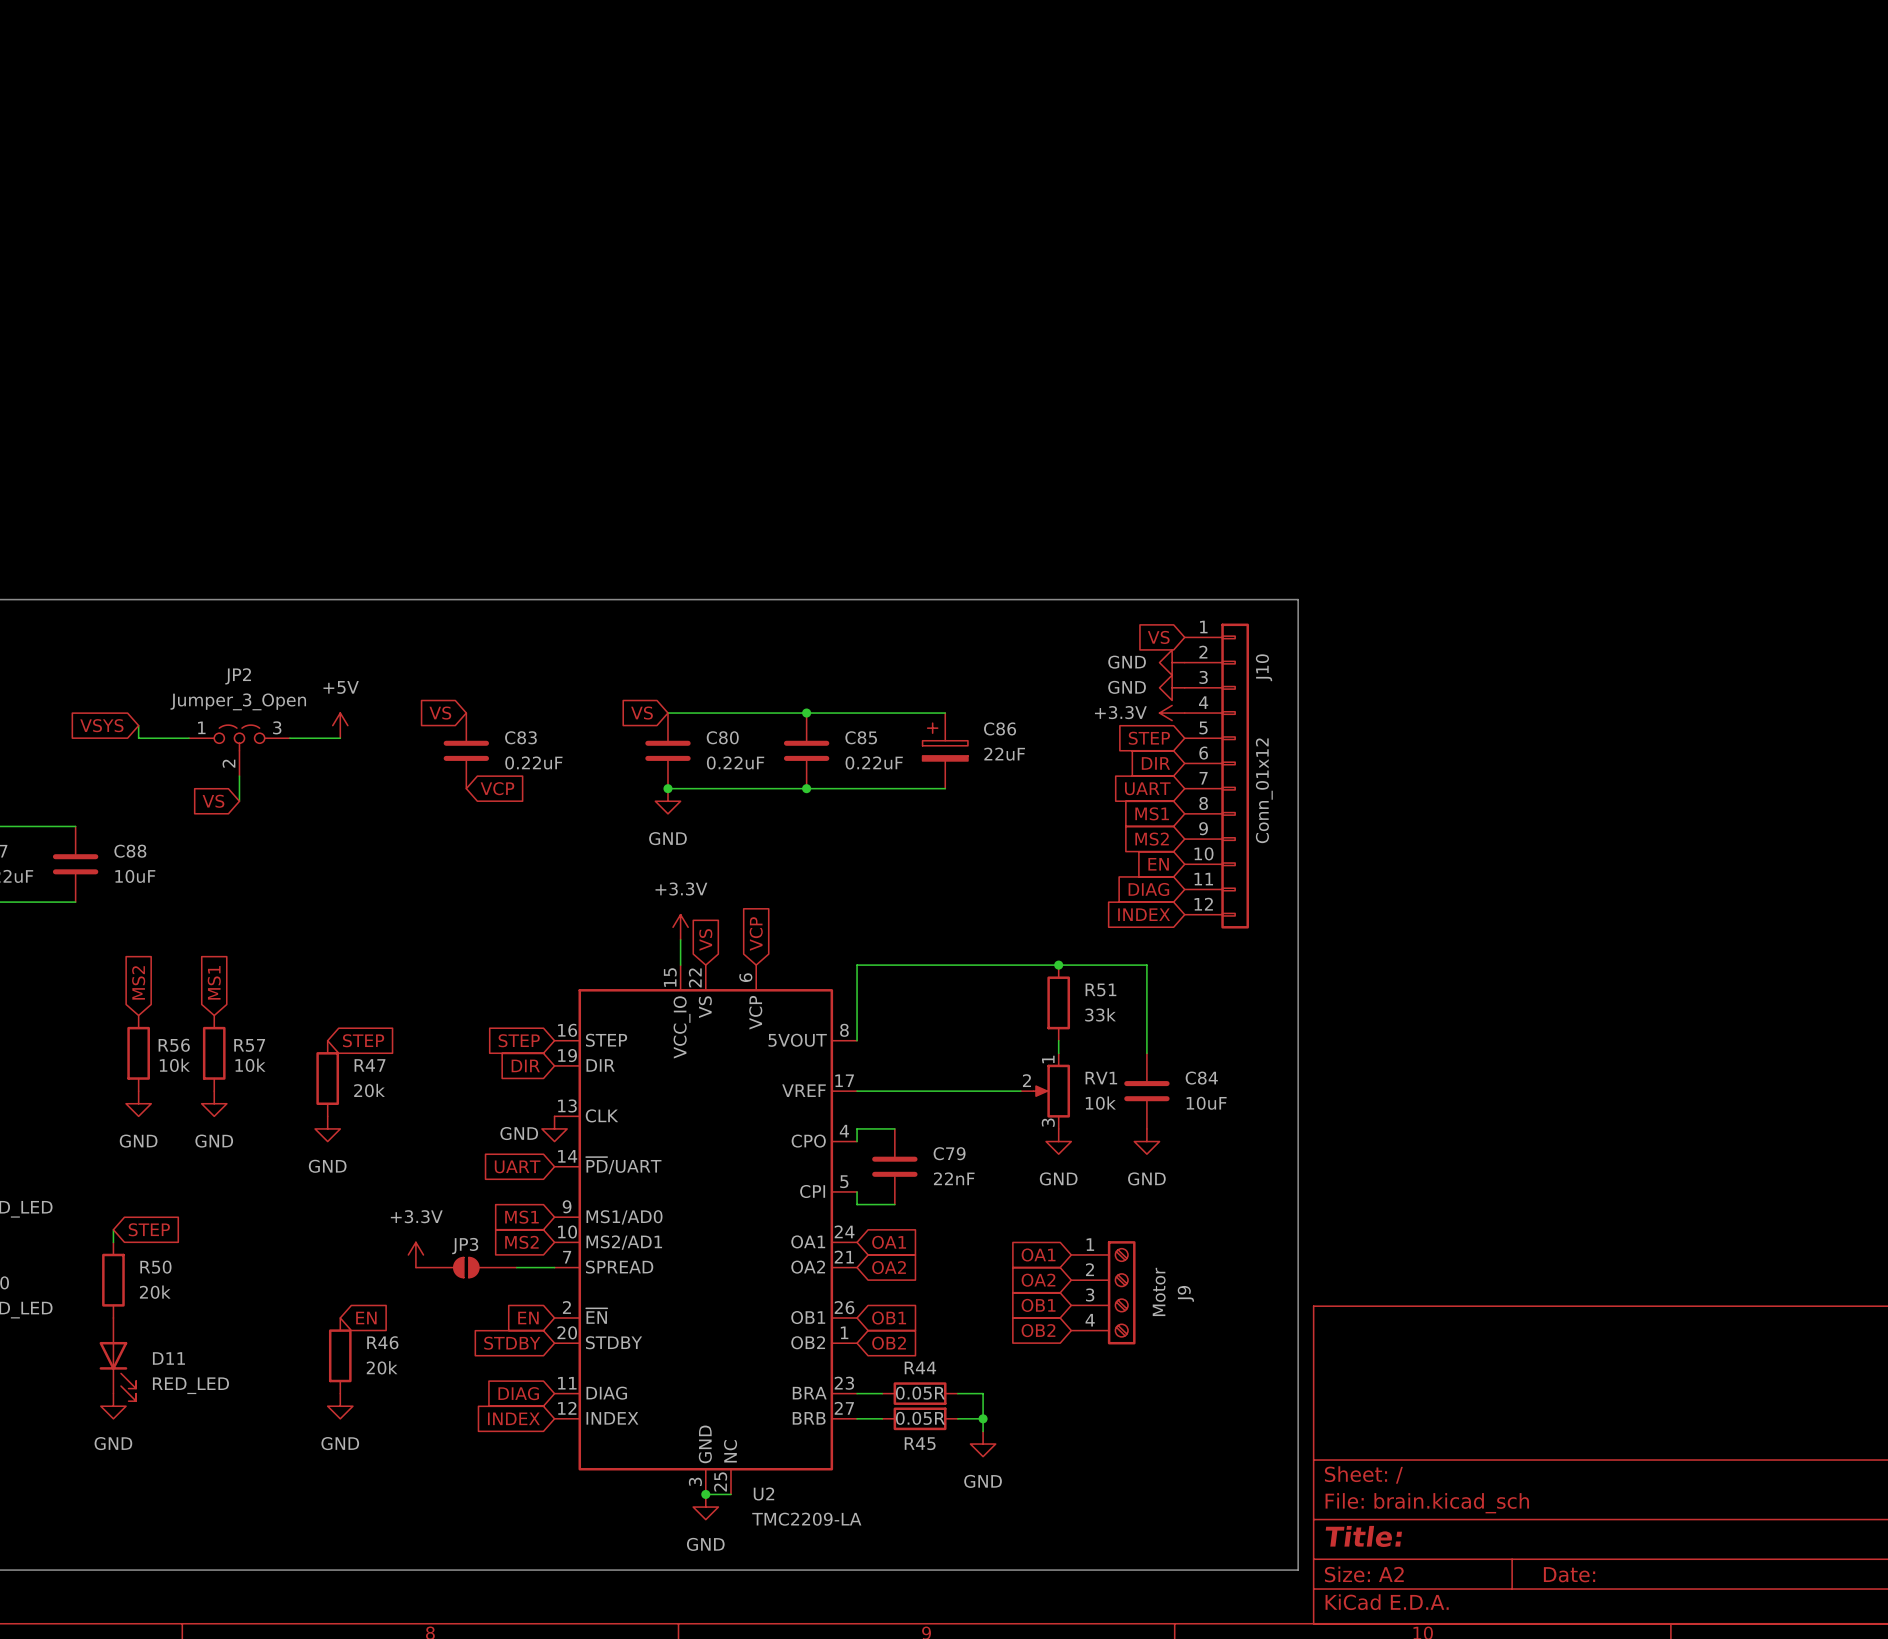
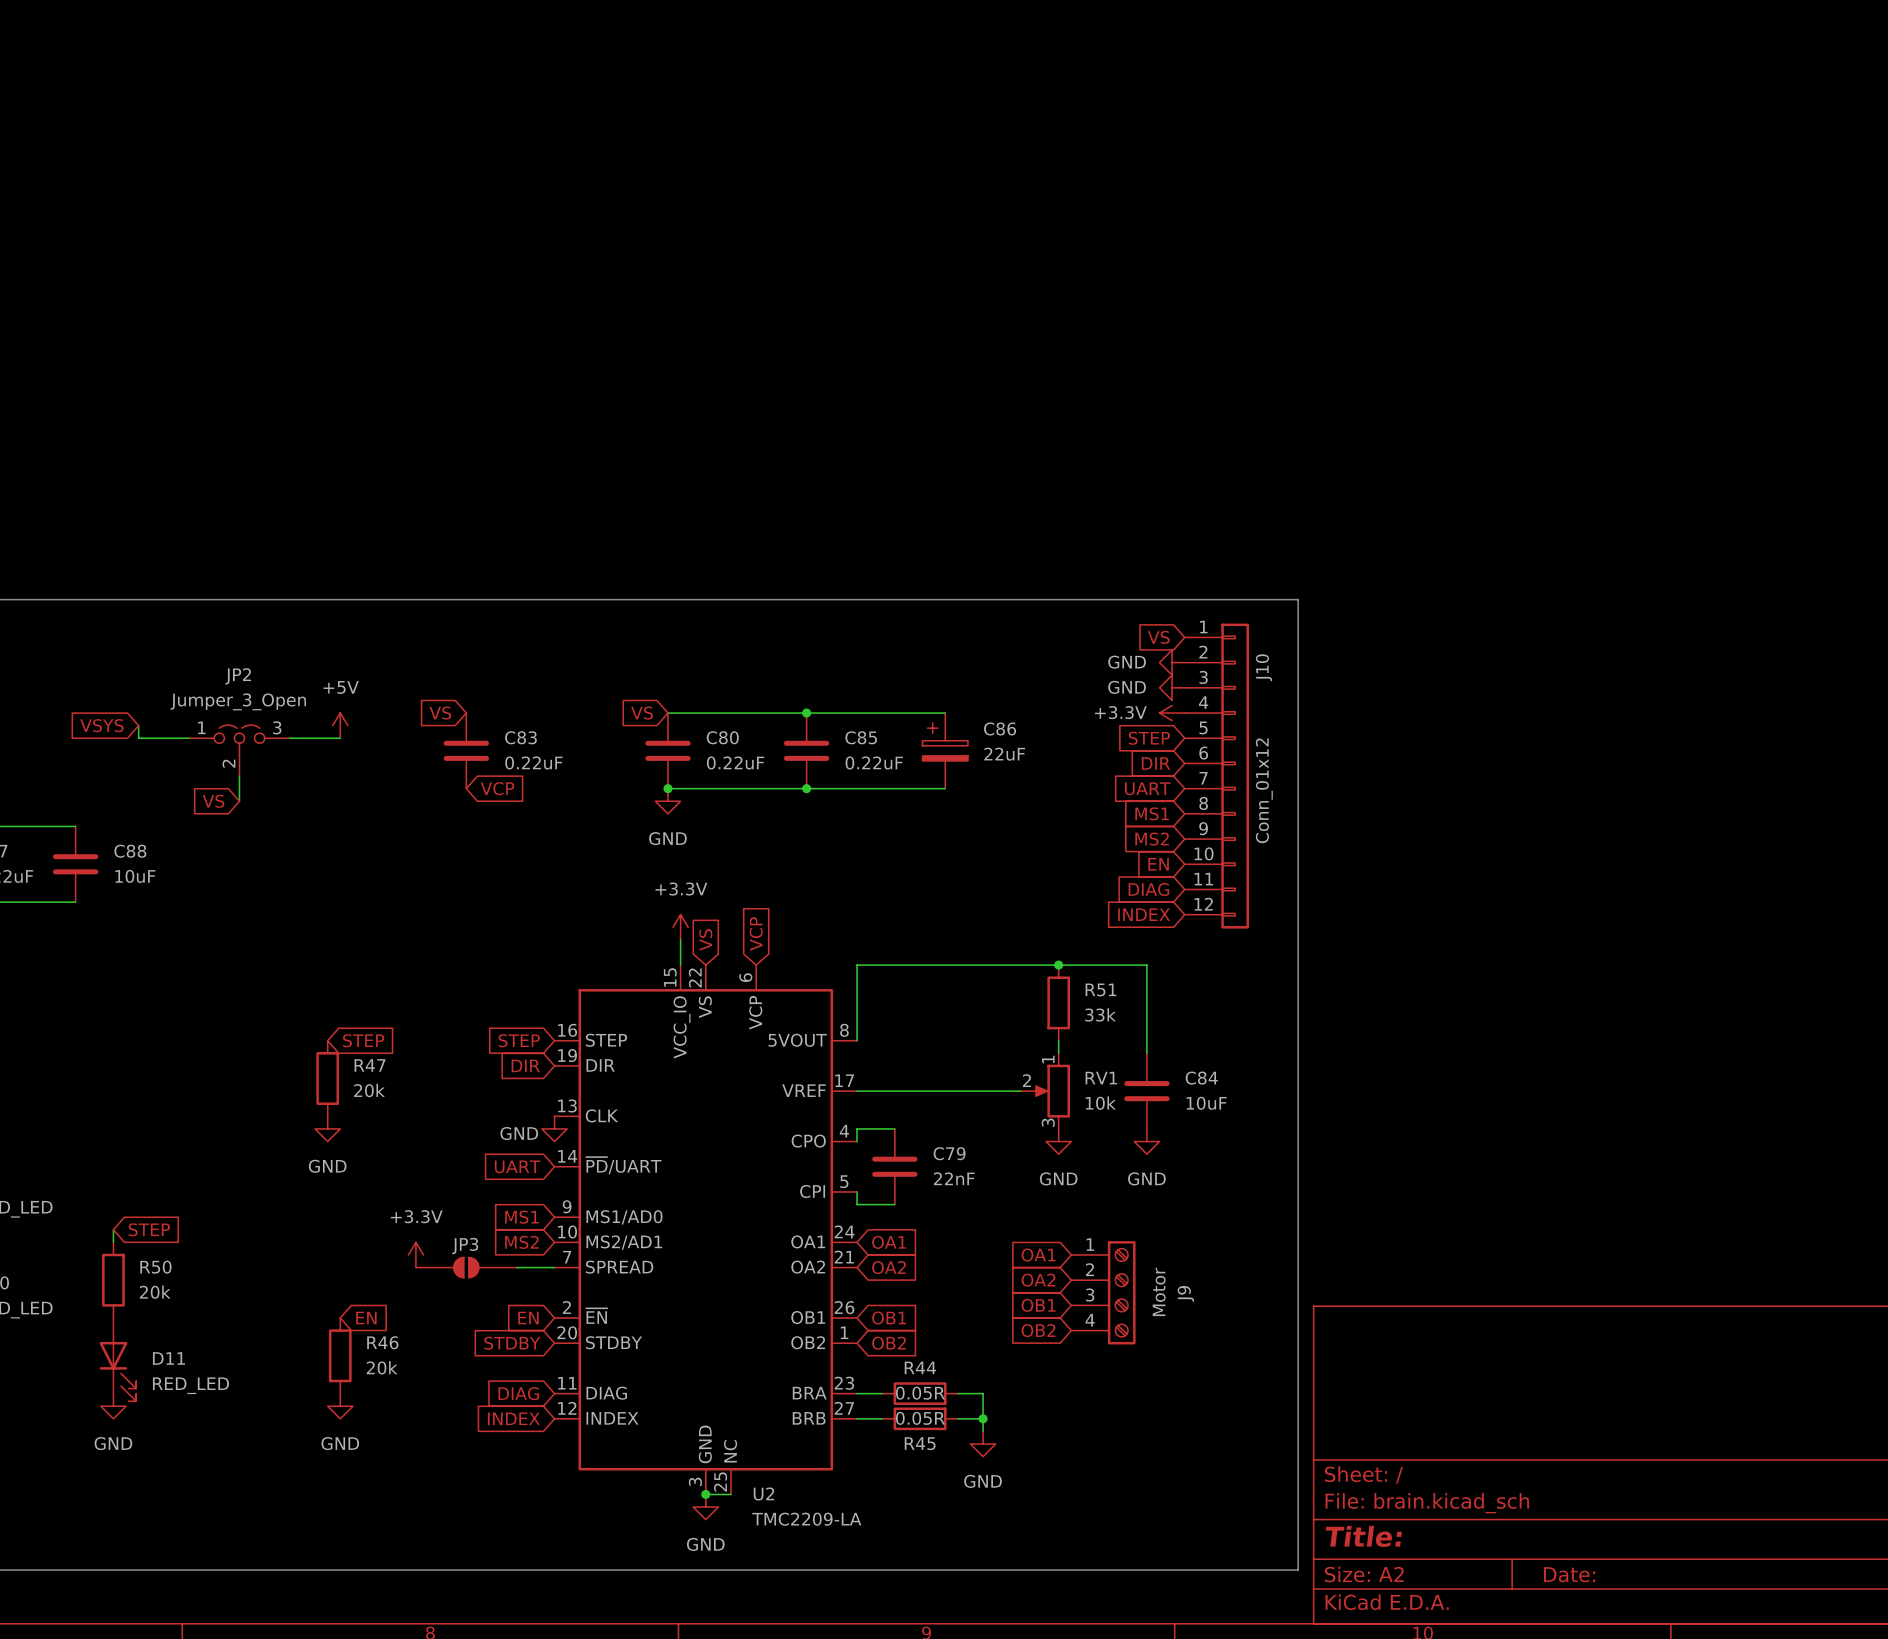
global label: MS2 (138, 982) -> none
global label: MS1 (214, 982) -> none
R56: 10k (138, 1053) -> none
R57: 10k (214, 1053) -> none
power symbol: GND (138, 1103) -> none
power symbol: GND (214, 1103) -> none

